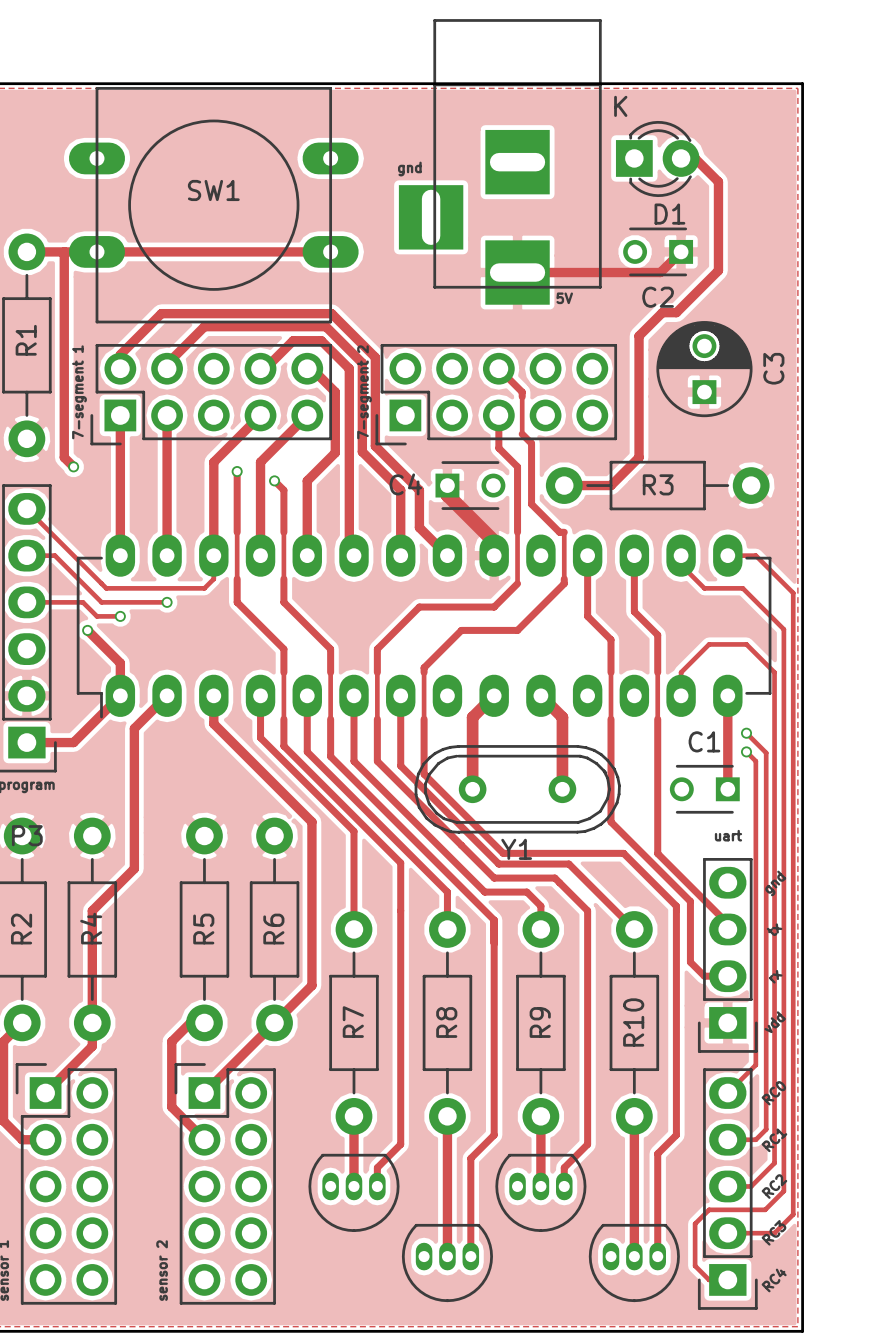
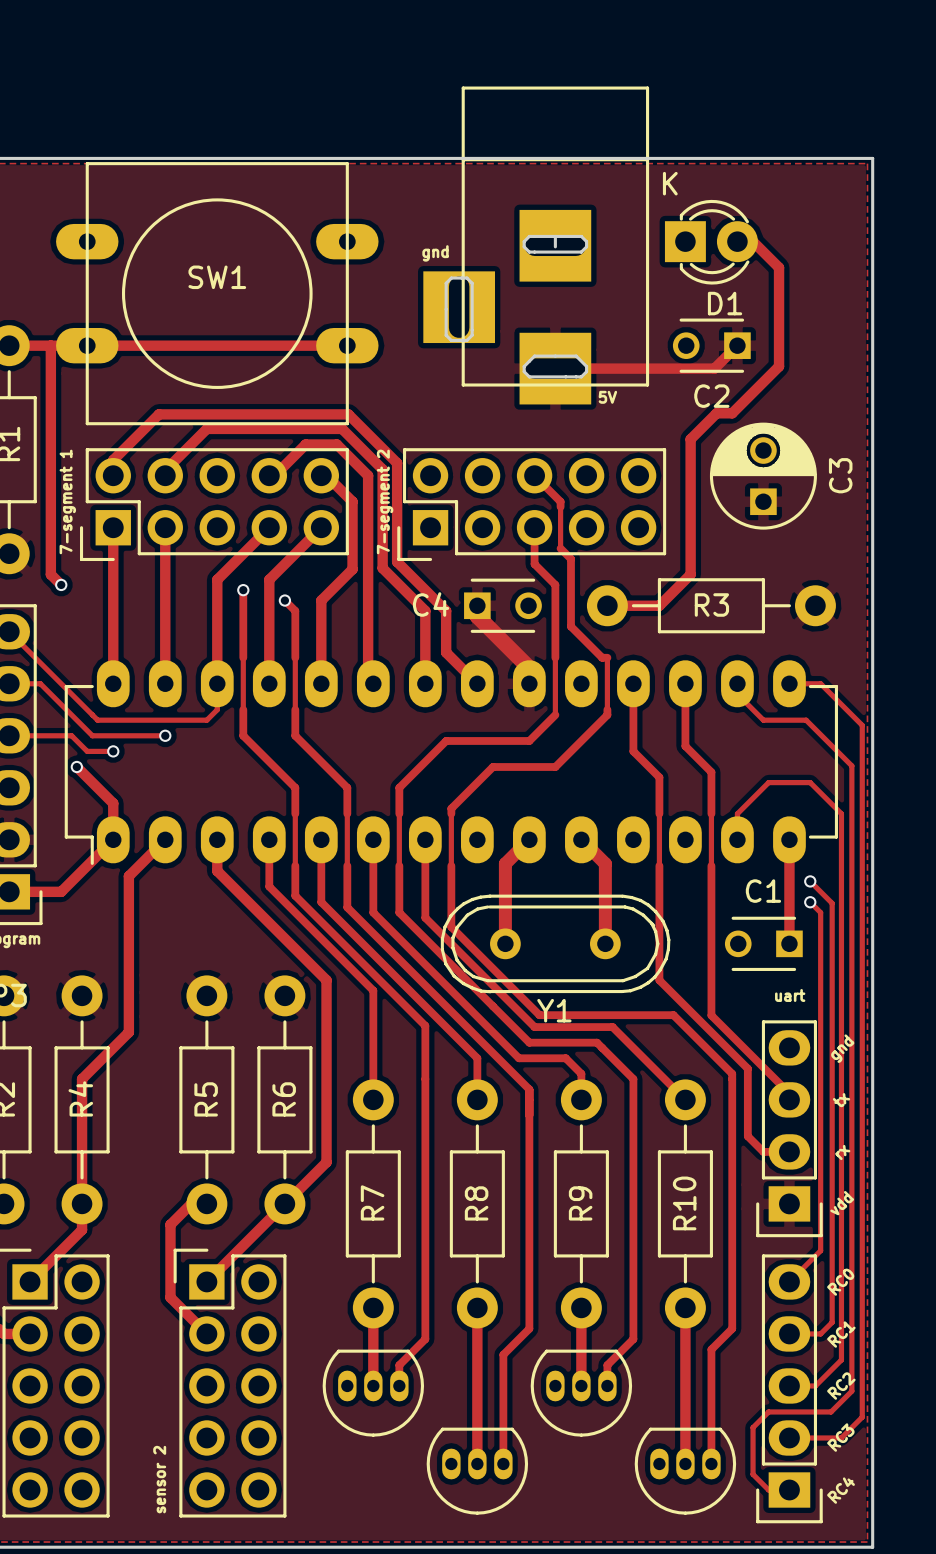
board edge: none -> (529, 236) (581, 236) (586, 241) (586, 246) (581, 252) (529, 252) (524, 246) (524, 241) (529, 236)
board edge: none -> (555, 236) (555, 246)
board edge: none -> (451, 278) (466, 278) (472, 283) (472, 335) (466, 340) (451, 340) (446, 335) (446, 283) (451, 278)
board edge: none -> (534, 356) (576, 356) (586, 366) (586, 371) (581, 376) (529, 376) (524, 371) (524, 366) (534, 356)

